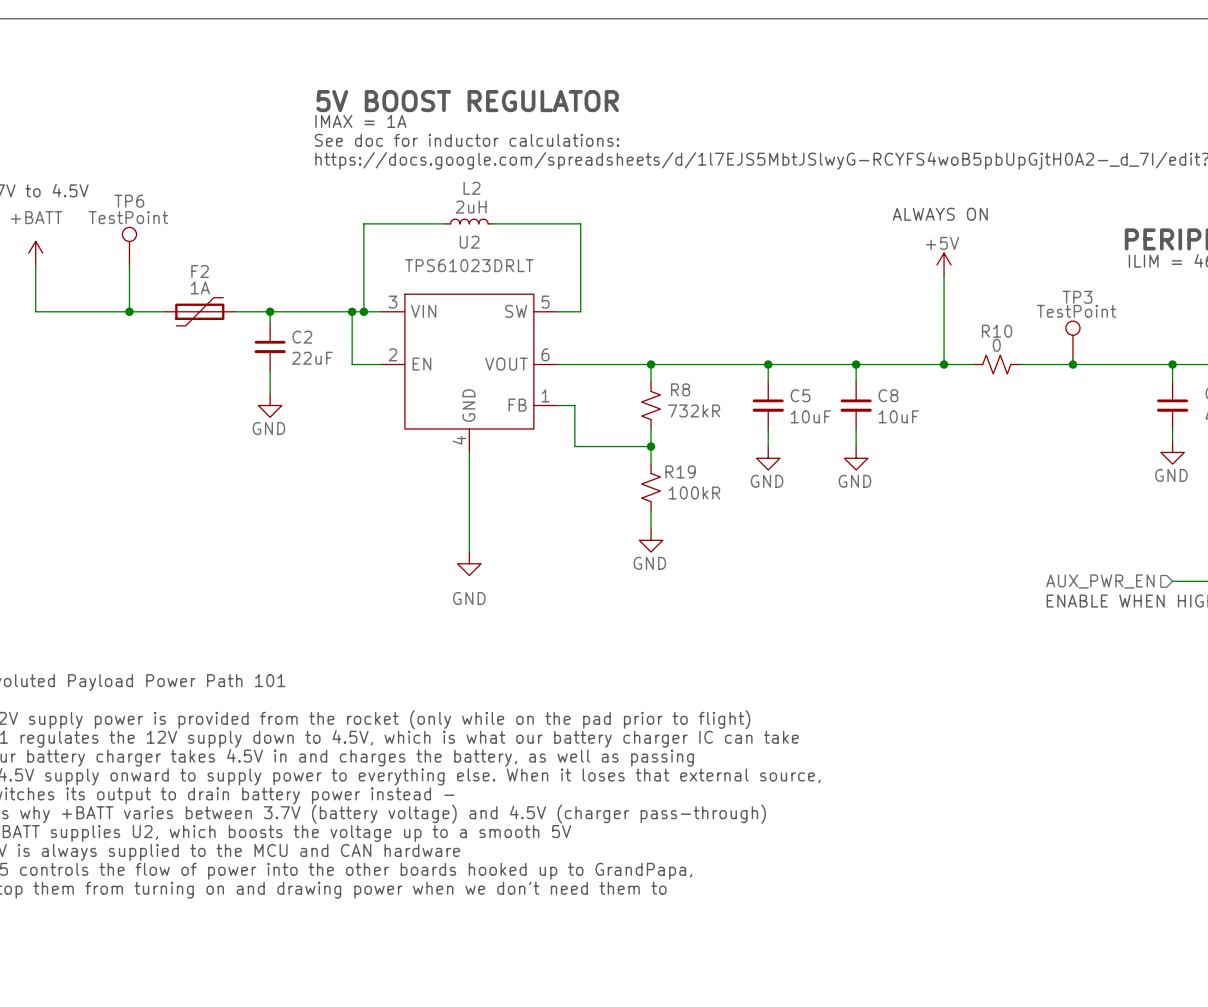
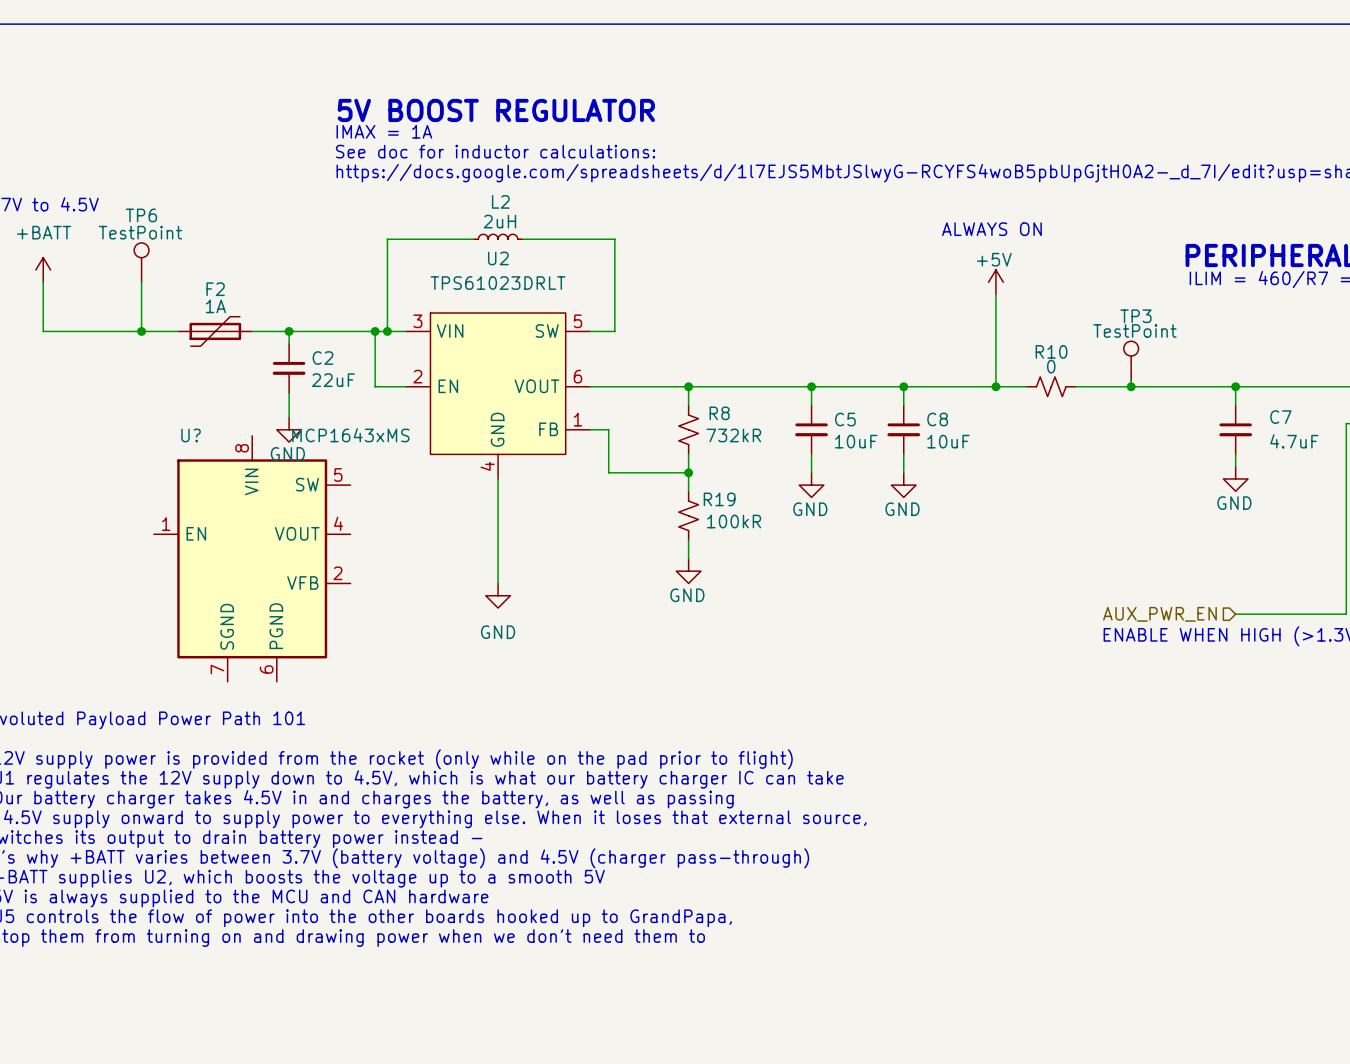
U?: none -> MCP1643xMS (252, 558)

